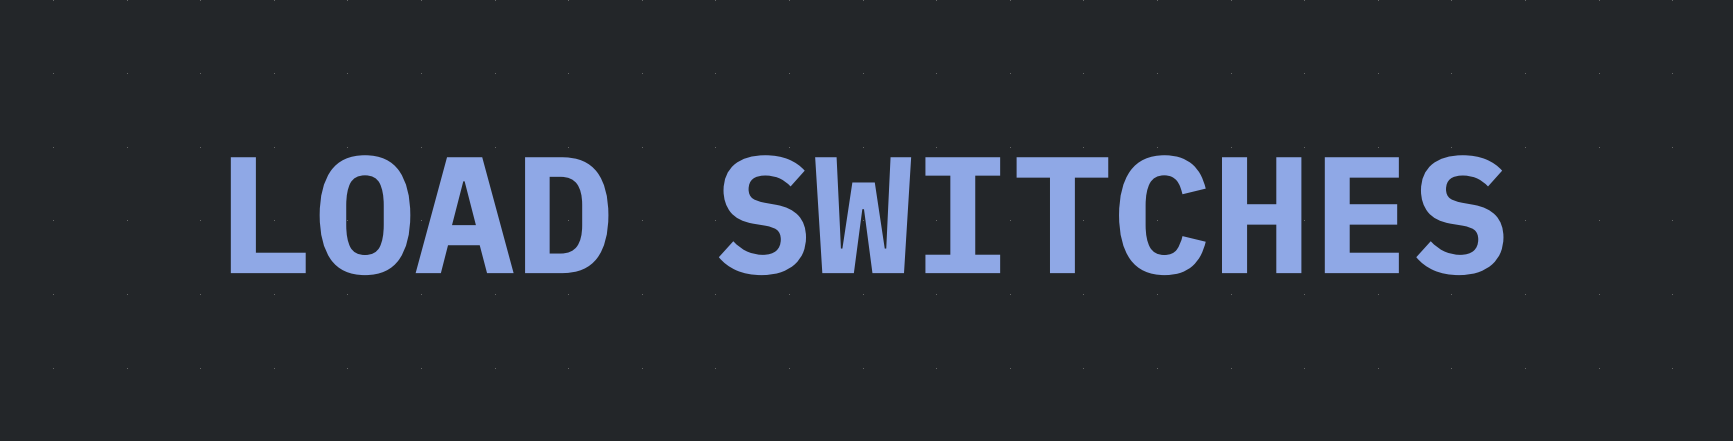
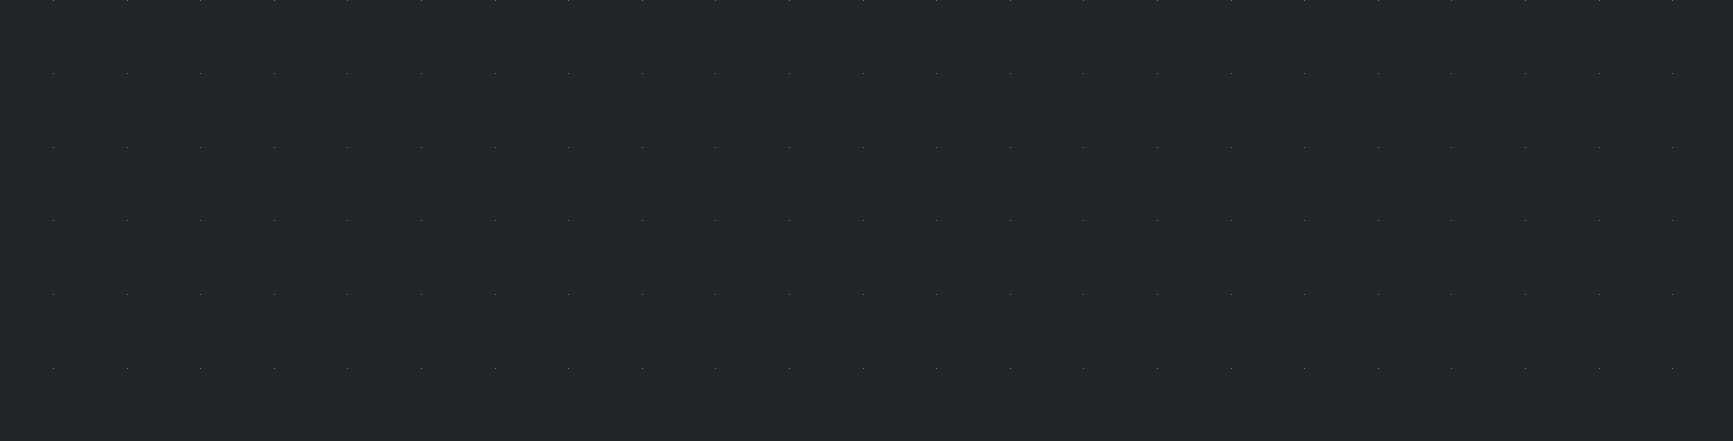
text: LOAD SWITCHES (867, 215) -> none

